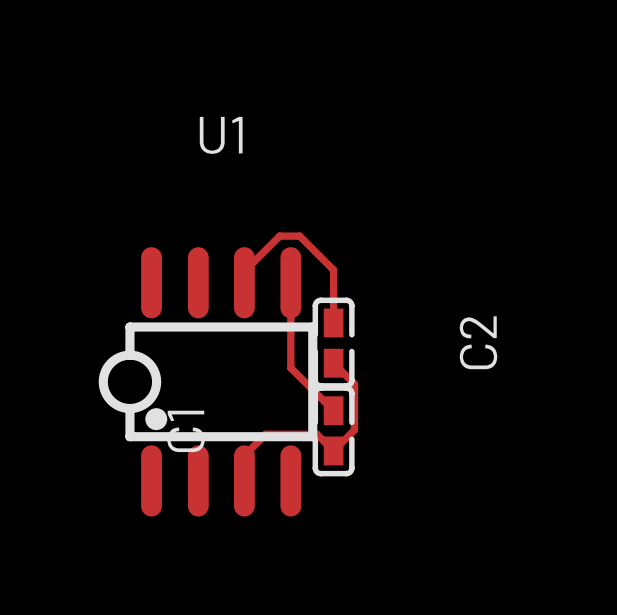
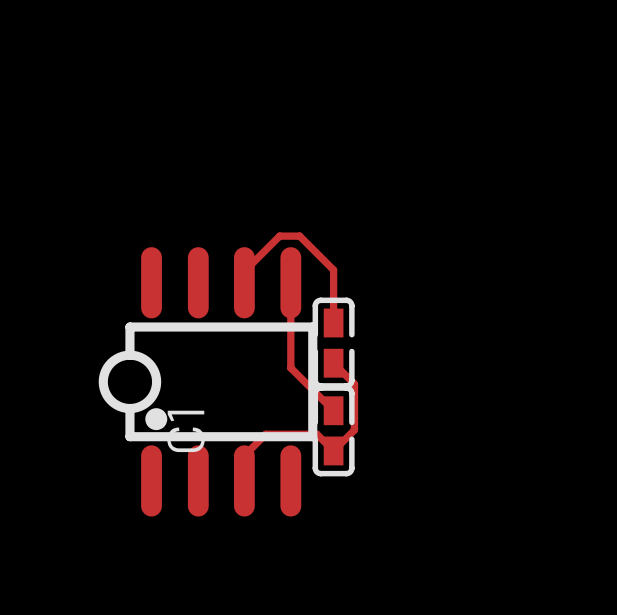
U1 name: U1 (221, 135) -> none
C2 name: C2 (478, 342) -> none

